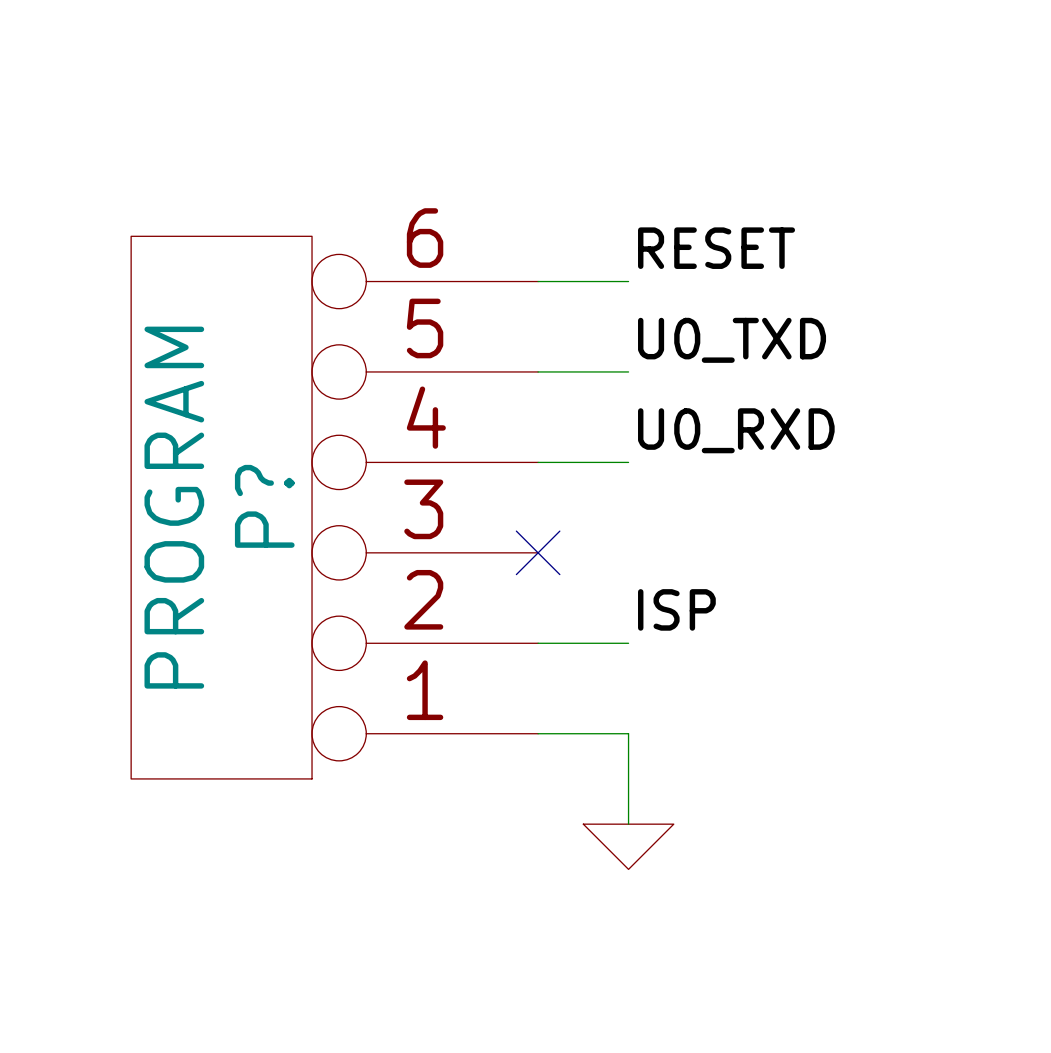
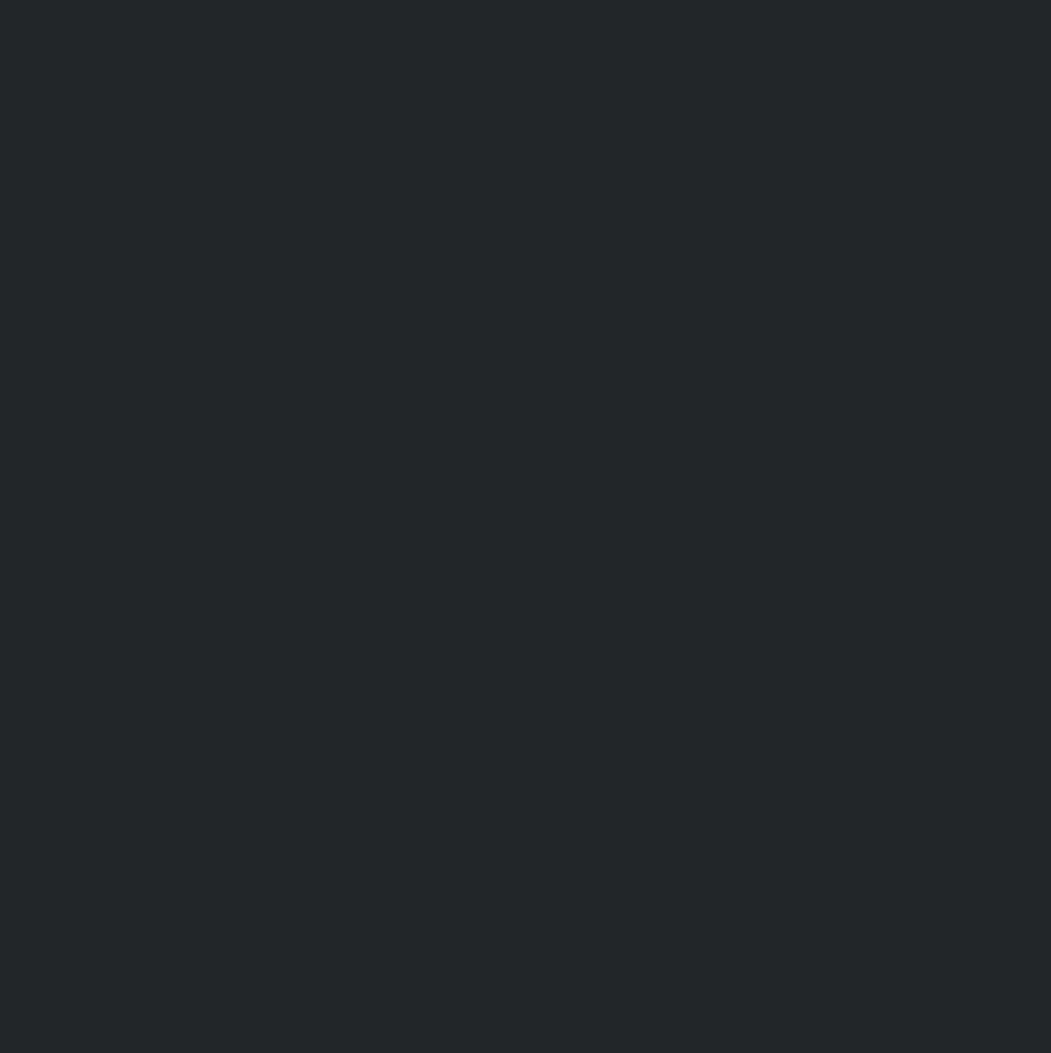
label: RESET (716, 248) -> none
wire: (538, 281) (628, 281) -> none
label: U0_TXD (732, 340) -> none
wire: (538, 371) (628, 371) -> none
label: U0_RXD (736, 430) -> none
wire: (538, 462) (628, 462) -> none
P?: PROGRAM (334, 507) -> none
no-connect mark: (538, 552) -> none
label: ISP (676, 609) -> none
wire: (538, 643) (628, 643) -> none
wire: (538, 733) (628, 733) (628, 824) -> none
power symbol: (628, 846) -> none

